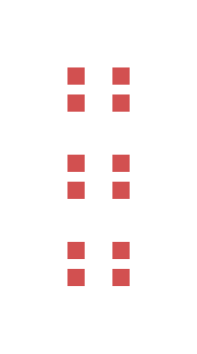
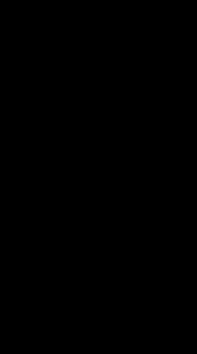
part: (98, 89) -> none
part: (98, 176) -> none
part: (98, 263) -> none

